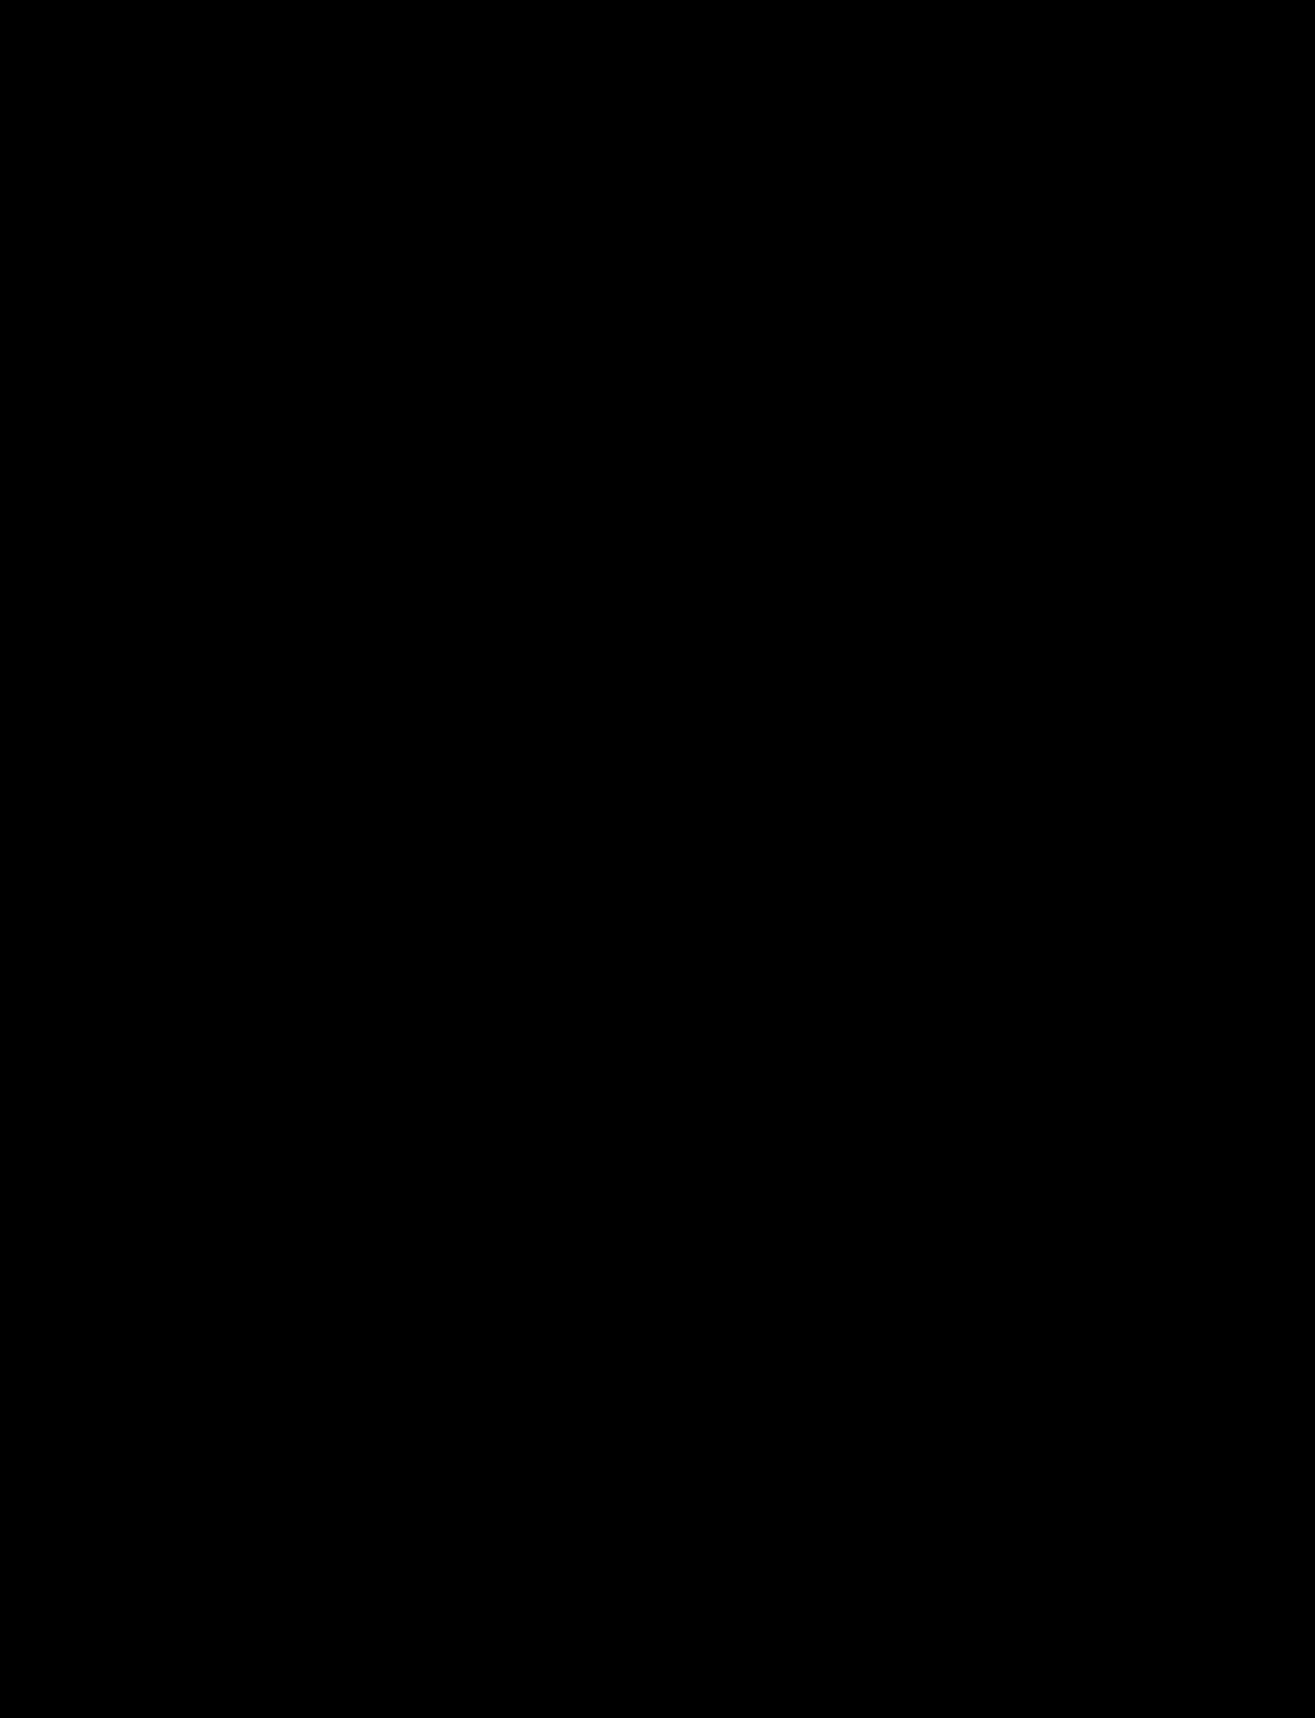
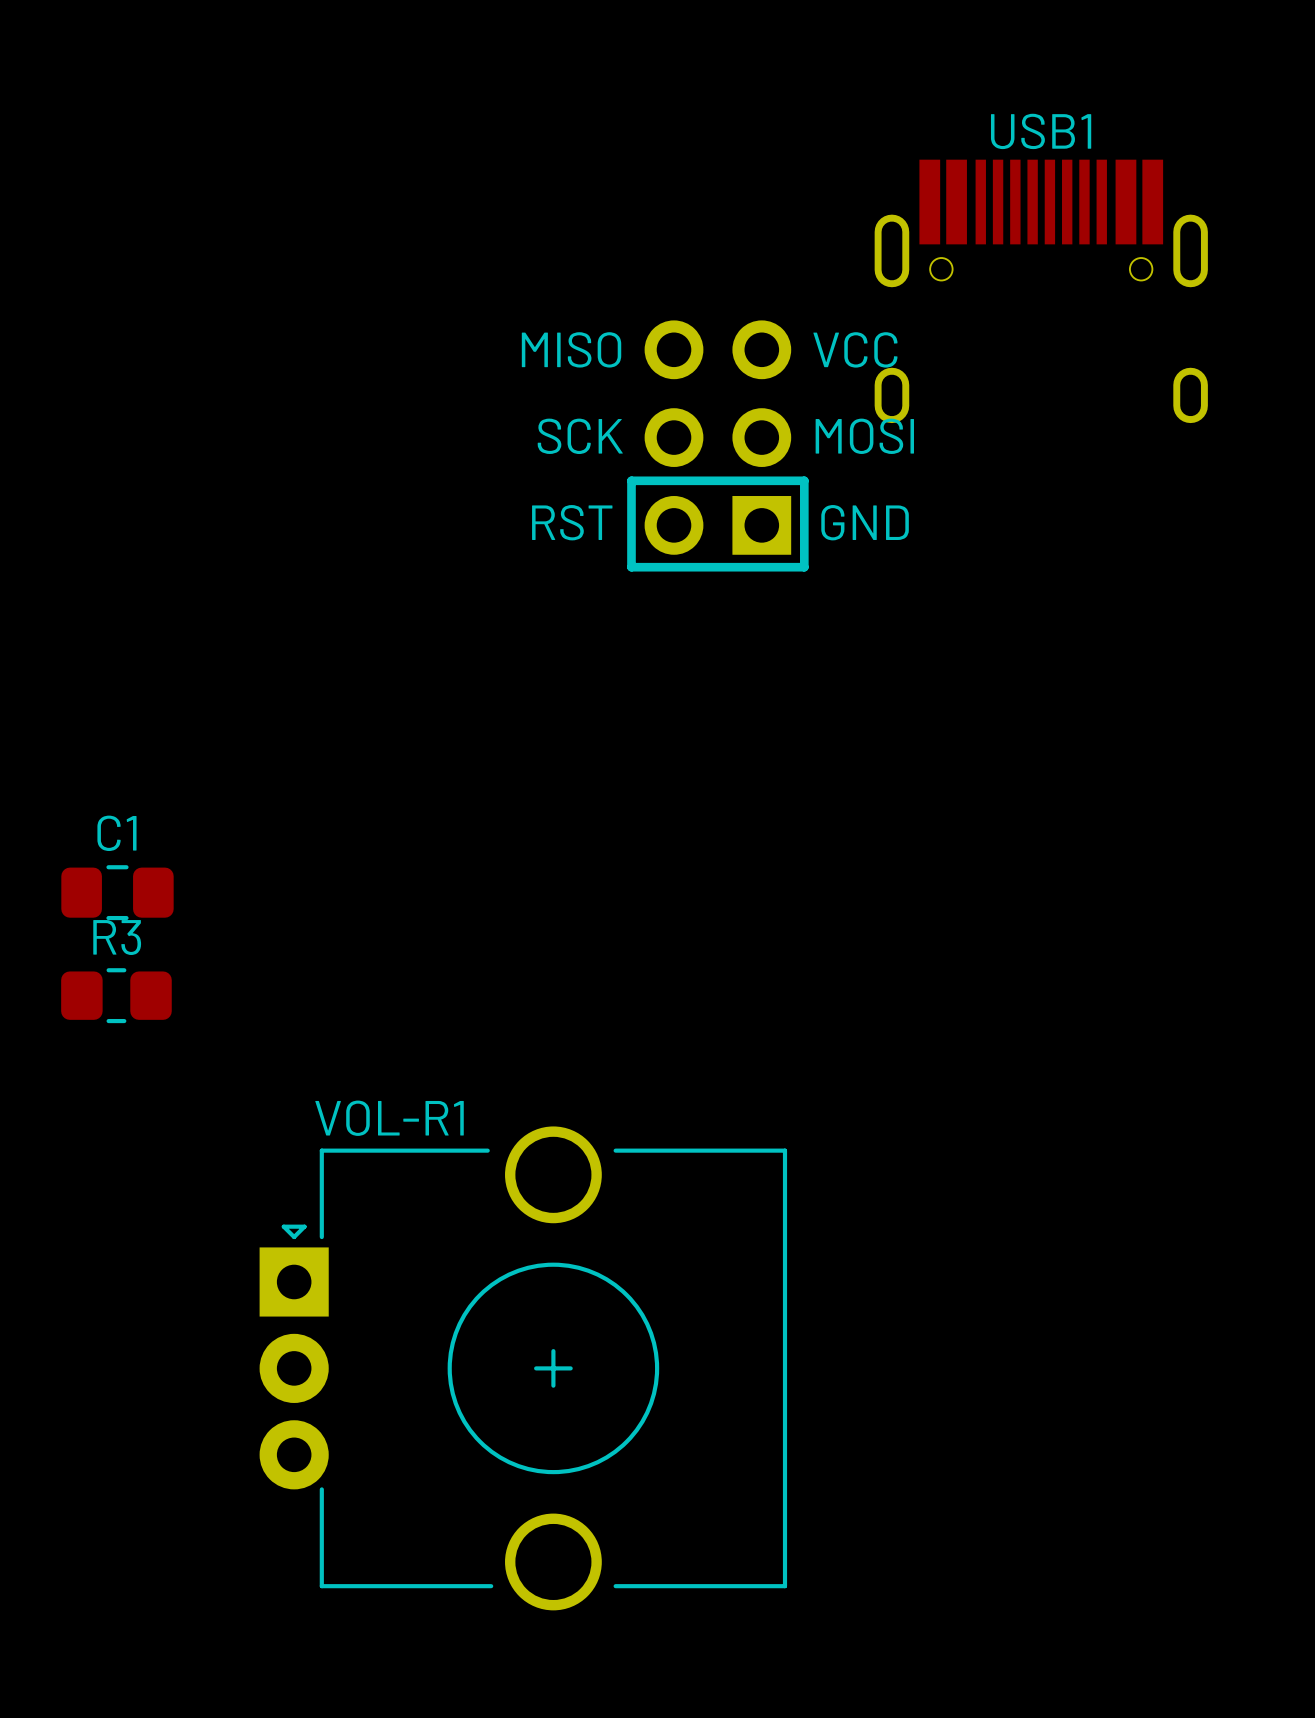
USB1: none -> (1041, 291)
part: none -> (717, 445)
C1: none -> (117, 892)
R3: none -> (116, 995)
VOL-R1: none -> (523, 1368)

